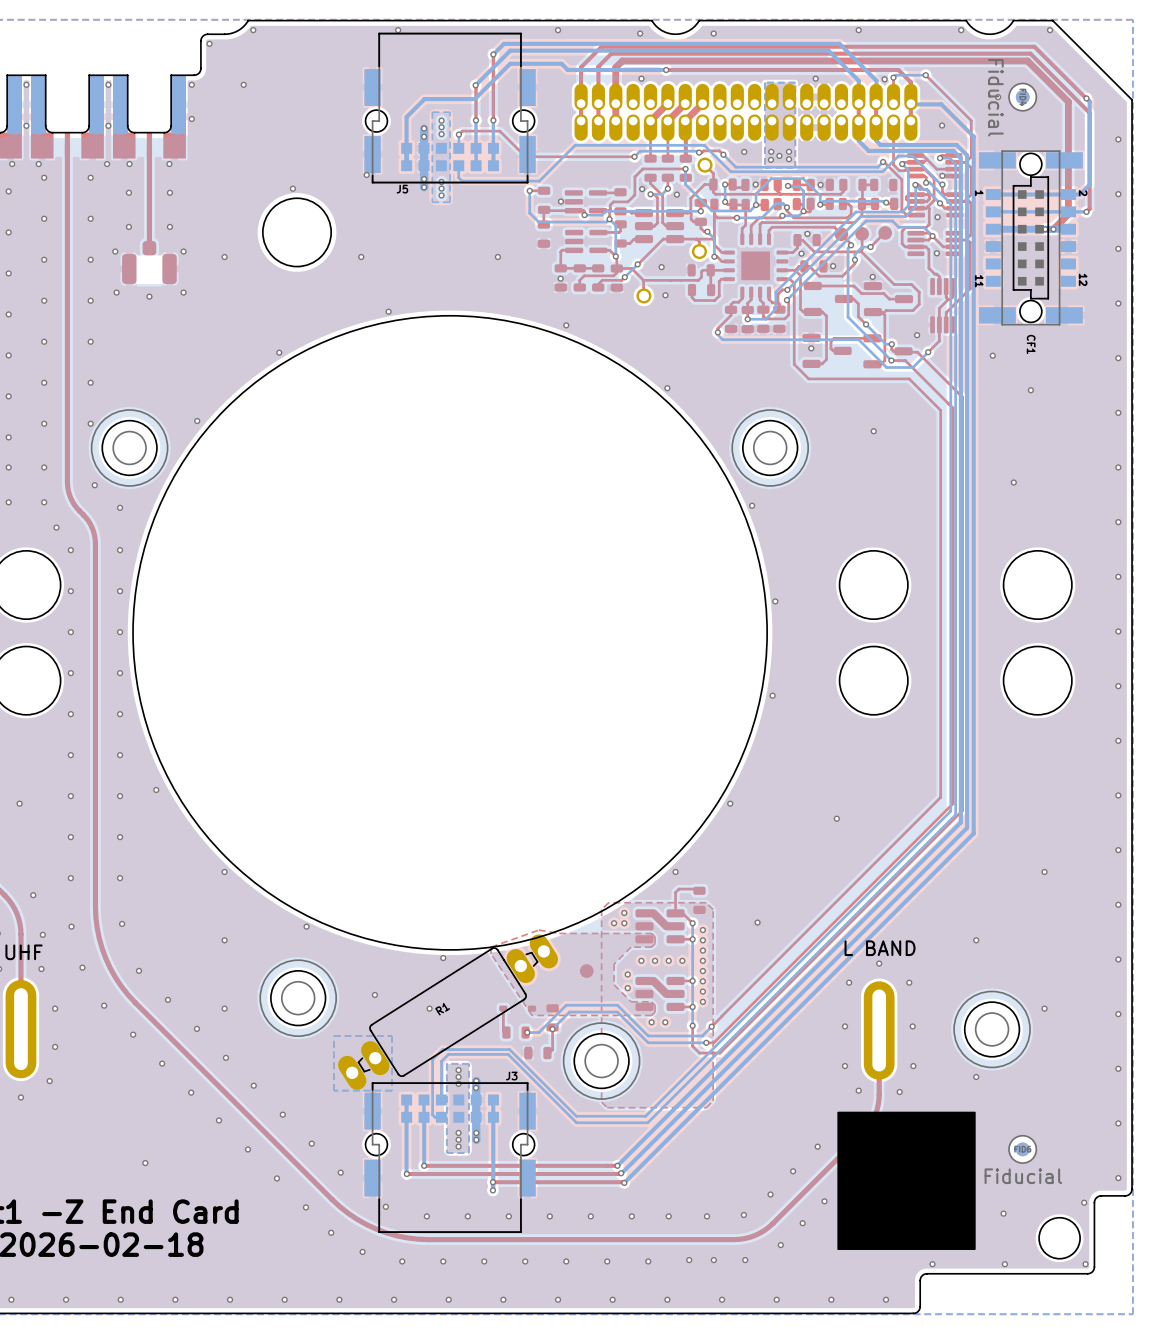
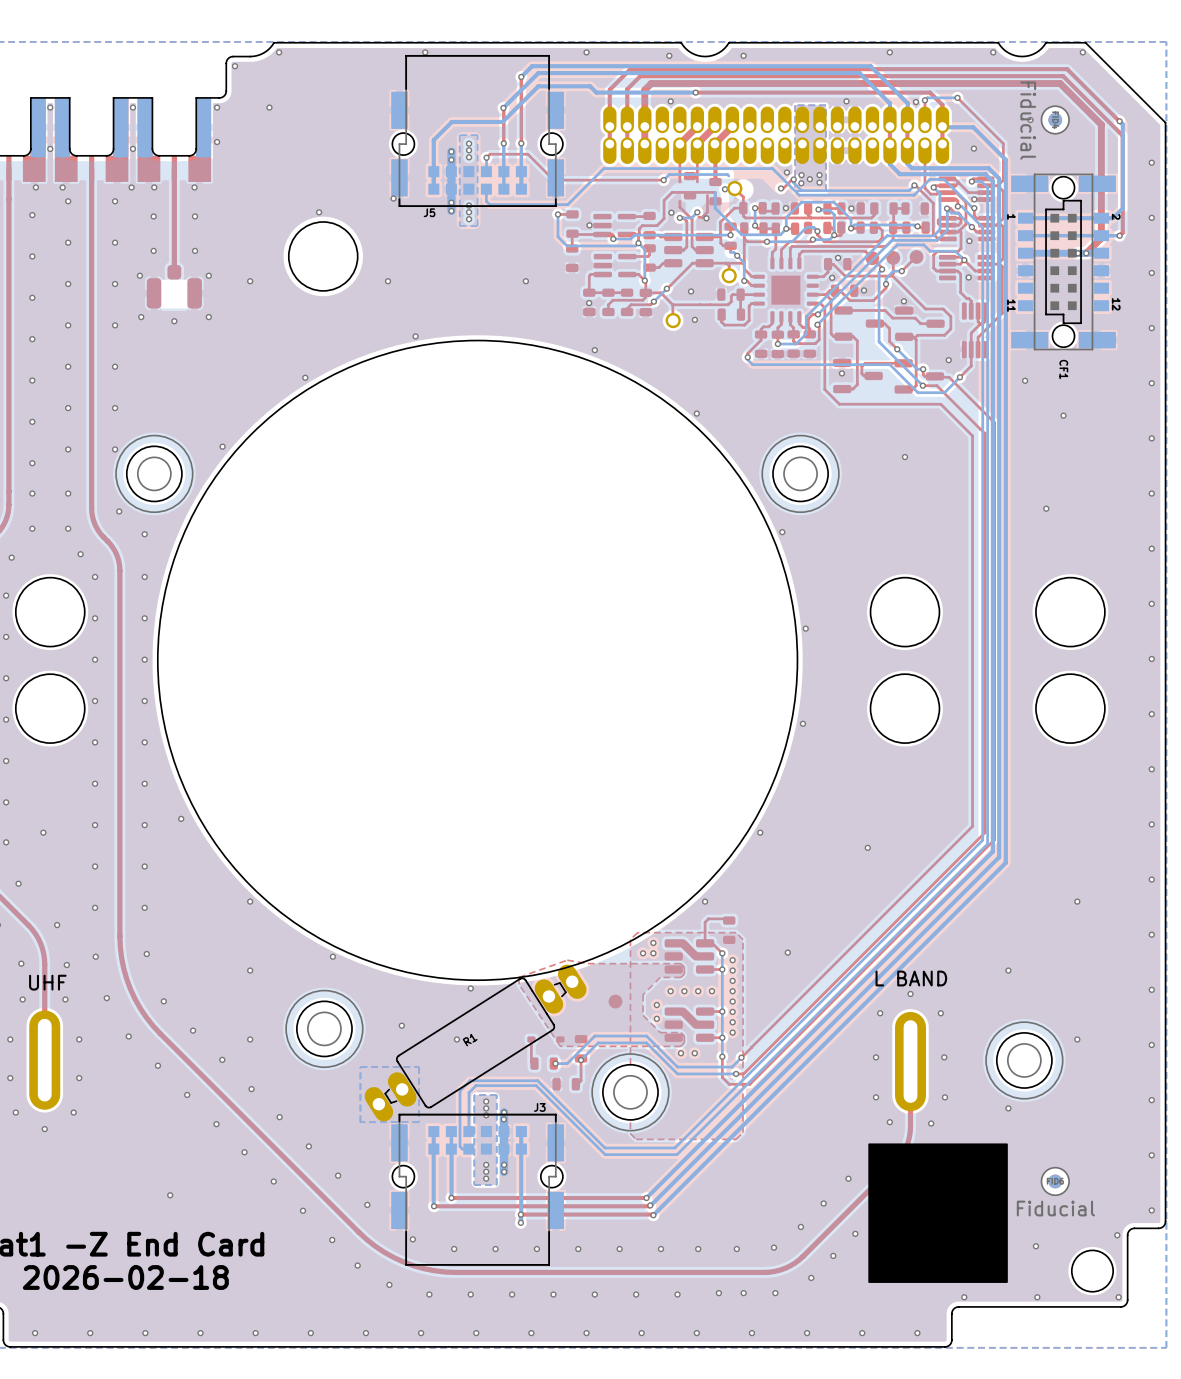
bottom track: (704, 145) (730, 171) (768, 171) -> (734, 168) (772, 168) (799, 195)
via: none -> (786, 172)
via: (744, 151) -> none
top track: (699, 152) (719, 150) (723, 154) -> none
via: (699, 152) -> none
bottom track: (723, 154) (735, 167) (771, 167) -> (793, 179) (793, 182) (801, 190)
via: (723, 154) -> none
top track: none -> (793, 179) (781, 188)
via: none -> (793, 179)
part: none -> (689, 185)
via: none -> (725, 189)
via: none -> (781, 188)
part: (650, 168) -> none
part: (667, 168) -> none
via: (685, 168) -> none
top track: none -> (707, 195) (707, 212) (702, 217) (698, 217)
top track: (700, 228) (707, 231) -> none
bottom track: none -> (730, 252) (737, 255)

